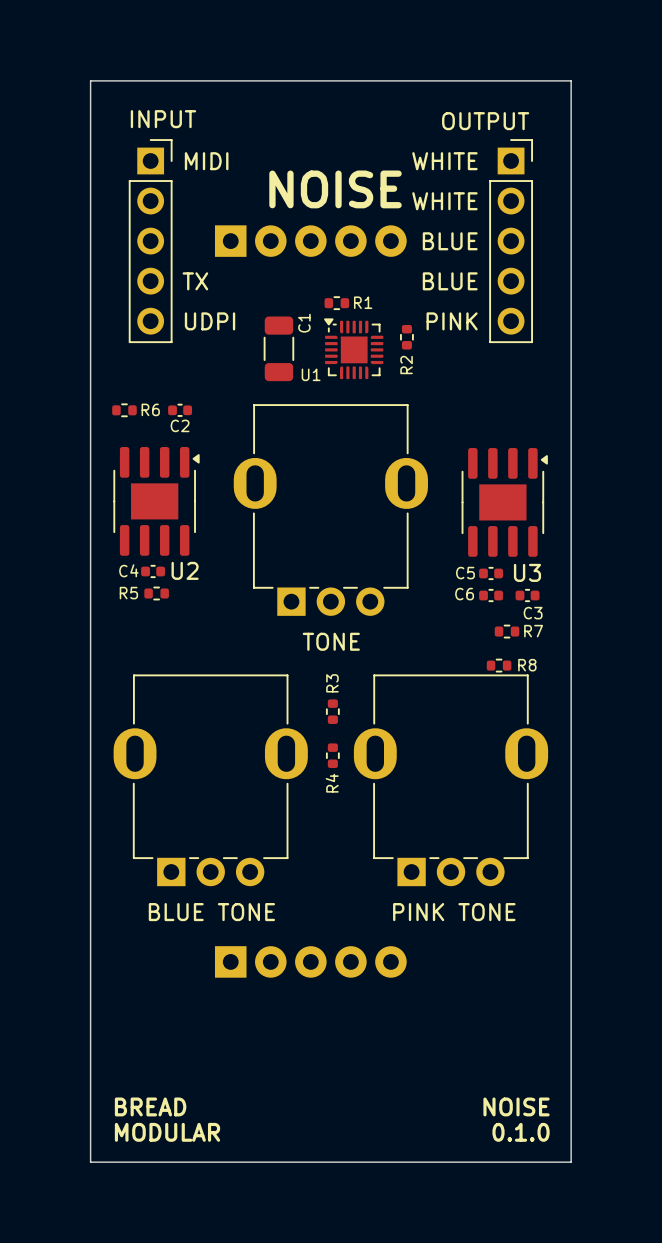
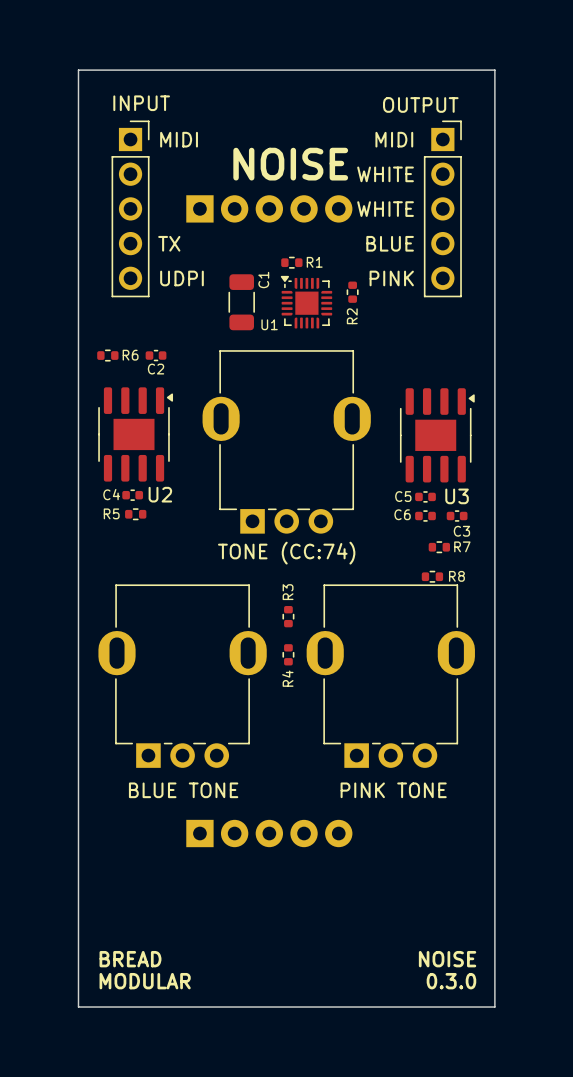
text: WHITE (444, 161) -> MIDI (394, 139)
text: BLUE (450, 241) -> WHITE (385, 209)
text: none -> TONE (CC:74) (286, 553)
text: TONE (331, 641) -> none
text: 0.1.0 (521, 1132) -> 0.3.0 (451, 981)

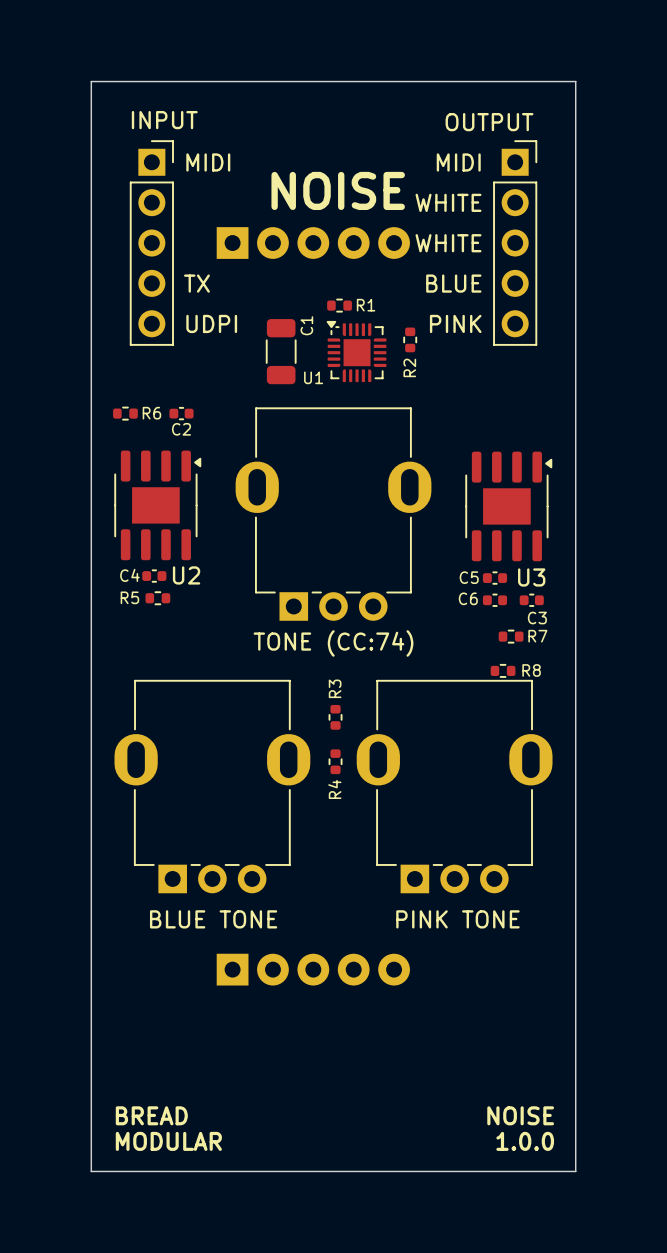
text: 0.3.0 (451, 981) -> 1.0.0 (525, 1141)

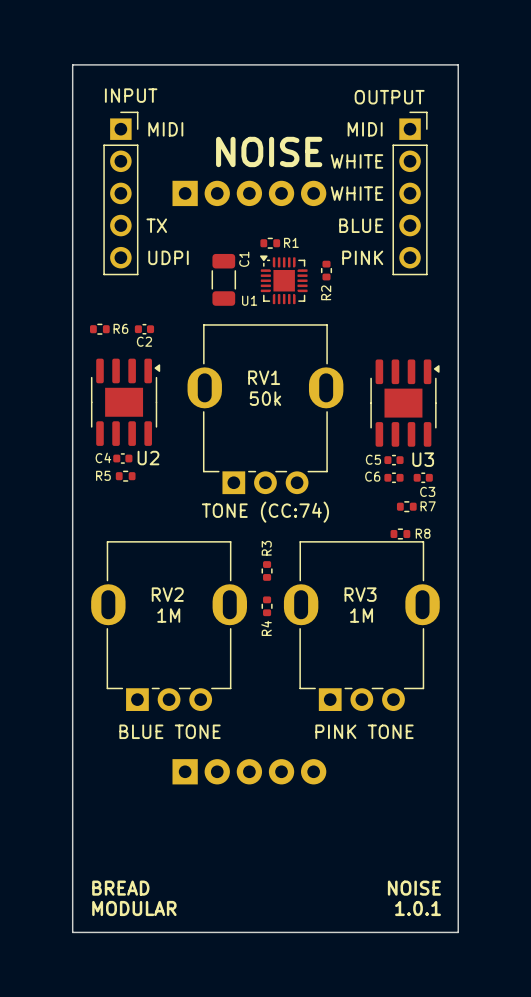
RV1 name: none -> RV1 (264, 377)
RV1 value: none -> 50k (265, 398)
RV2 name: none -> RV2 (167, 594)
RV3 name: none -> RV3 (360, 594)
RV2 value: none -> 1M (168, 615)
RV3 value: none -> 1M (361, 615)
text: 1.0.0 (525, 1141) -> 1.0.1 (418, 908)

